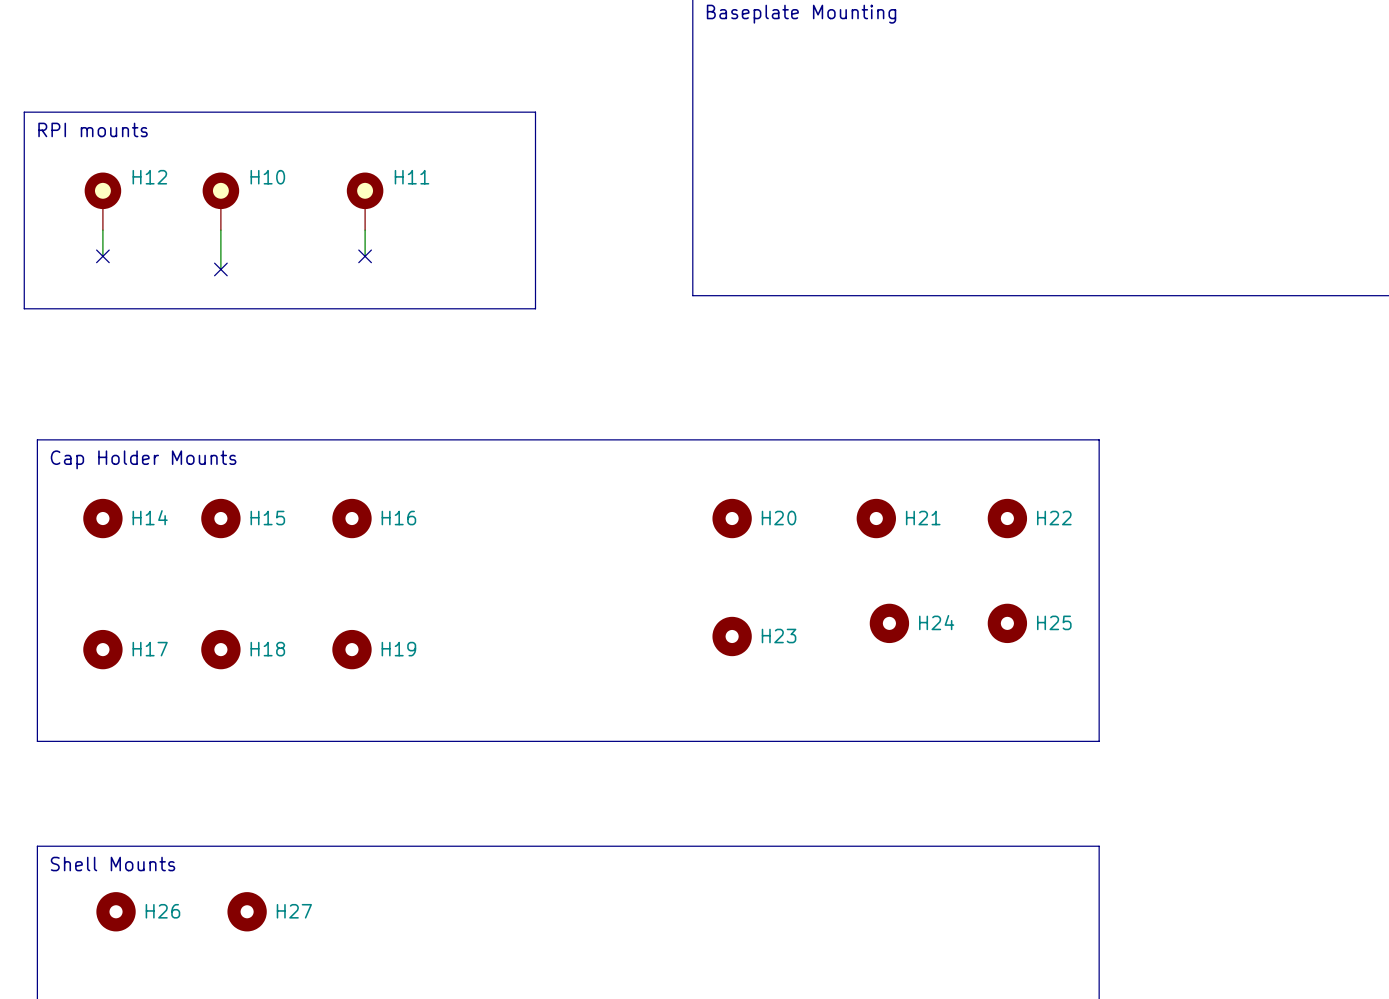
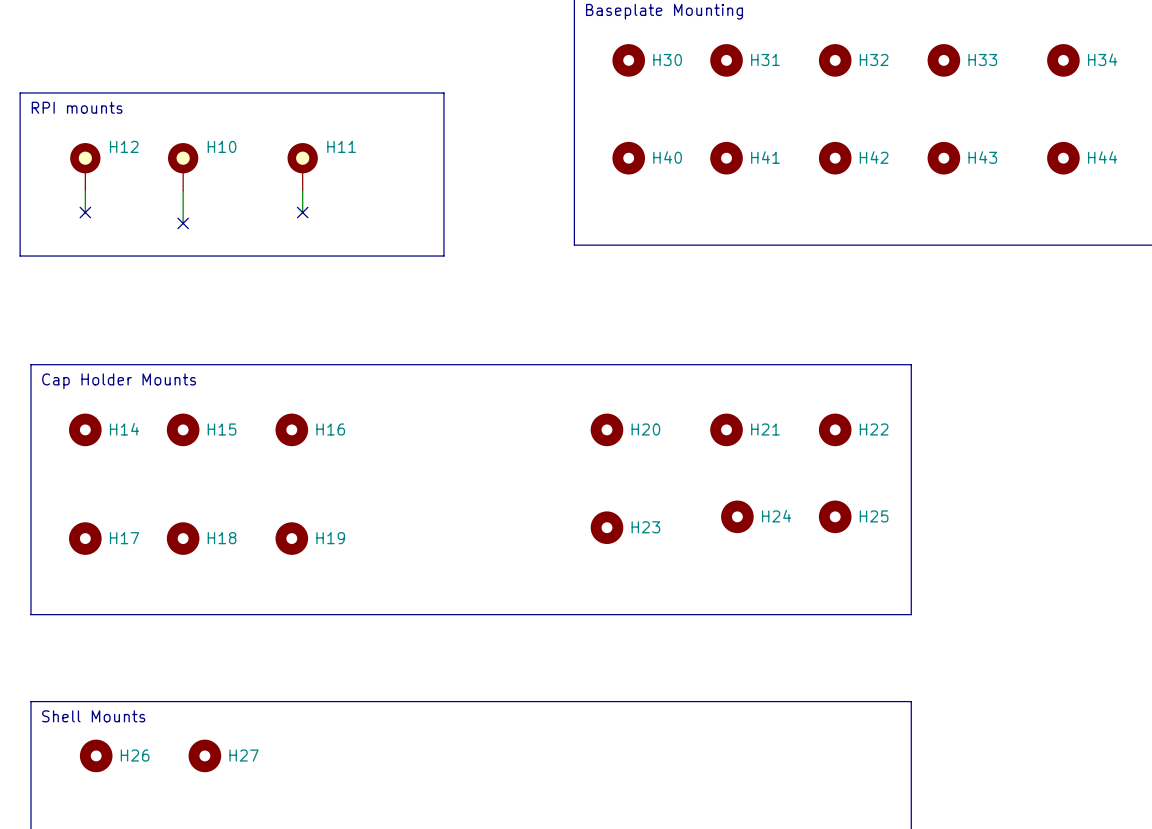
H30: none -> (628, 60)
H31: none -> (726, 60)
H32: none -> (835, 60)
H33: none -> (943, 60)
H34: none -> (1063, 60)
H40: none -> (628, 158)
H41: none -> (726, 158)
H42: none -> (835, 158)
H43: none -> (943, 158)
H44: none -> (1063, 158)

